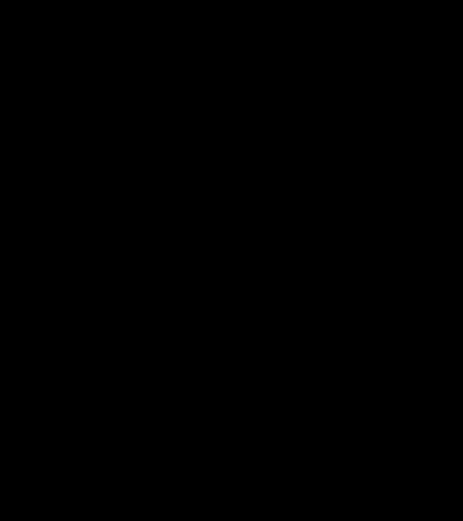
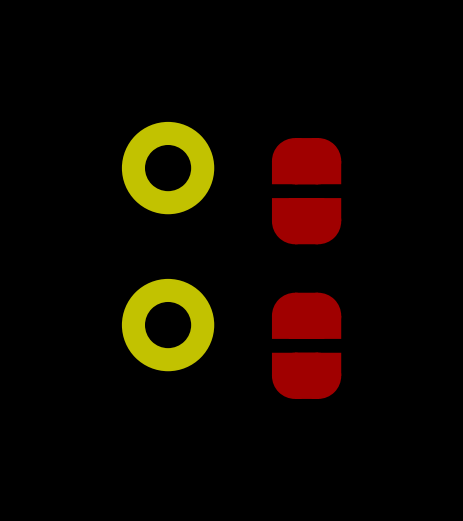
part: none -> (168, 168)
part: none -> (306, 191)
part: none -> (168, 325)
part: none -> (306, 345)

